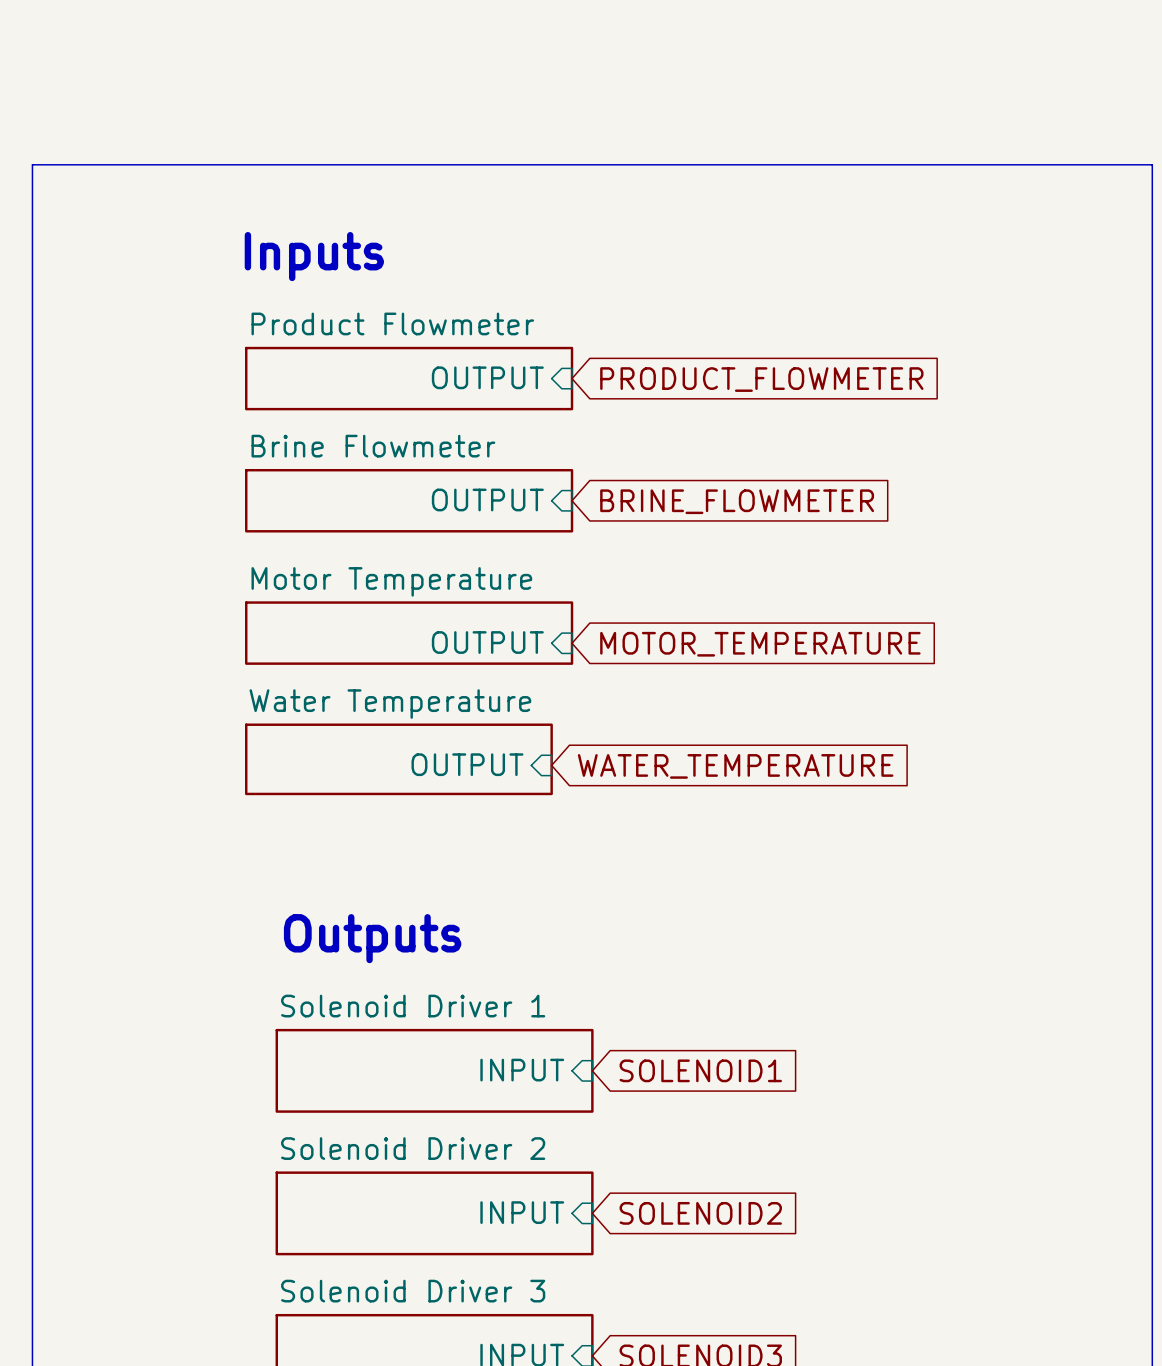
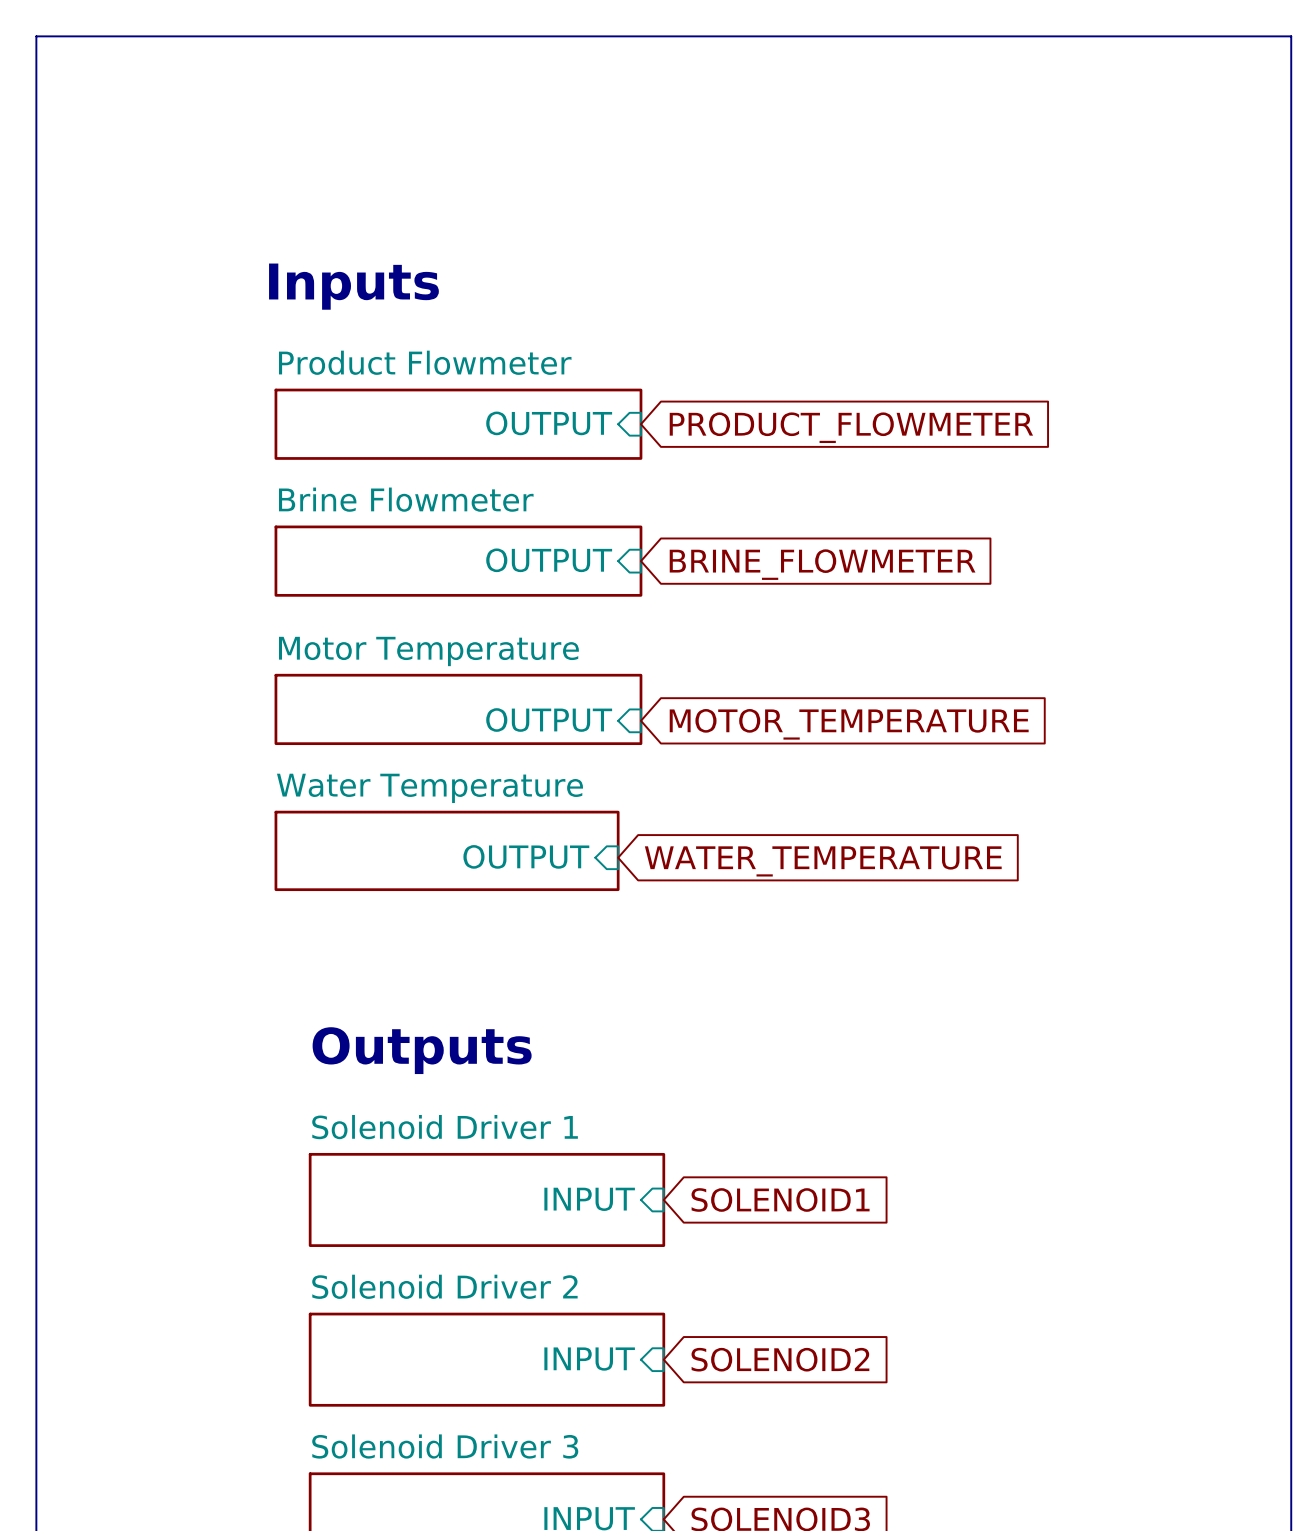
line: (32, 164) (1152, 164) -> (36, 184) (36, 36) (1291, 36) (1291, 184)

